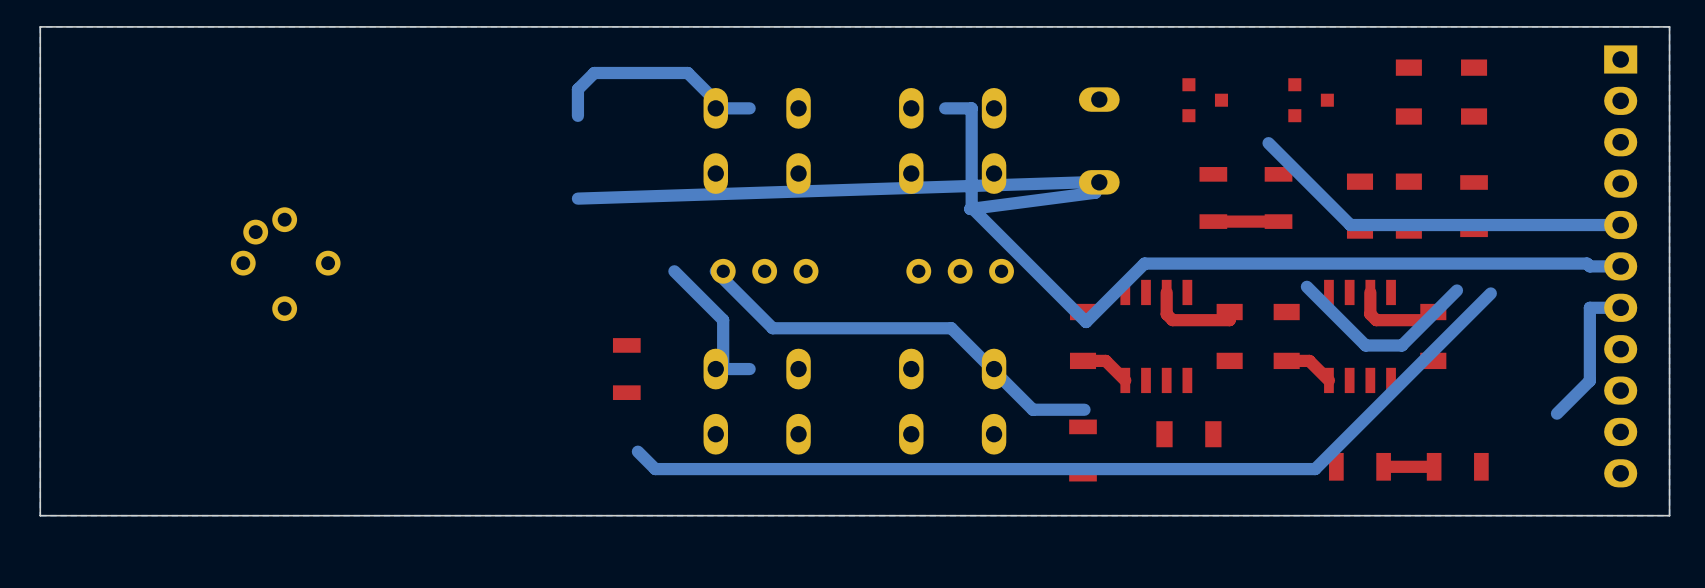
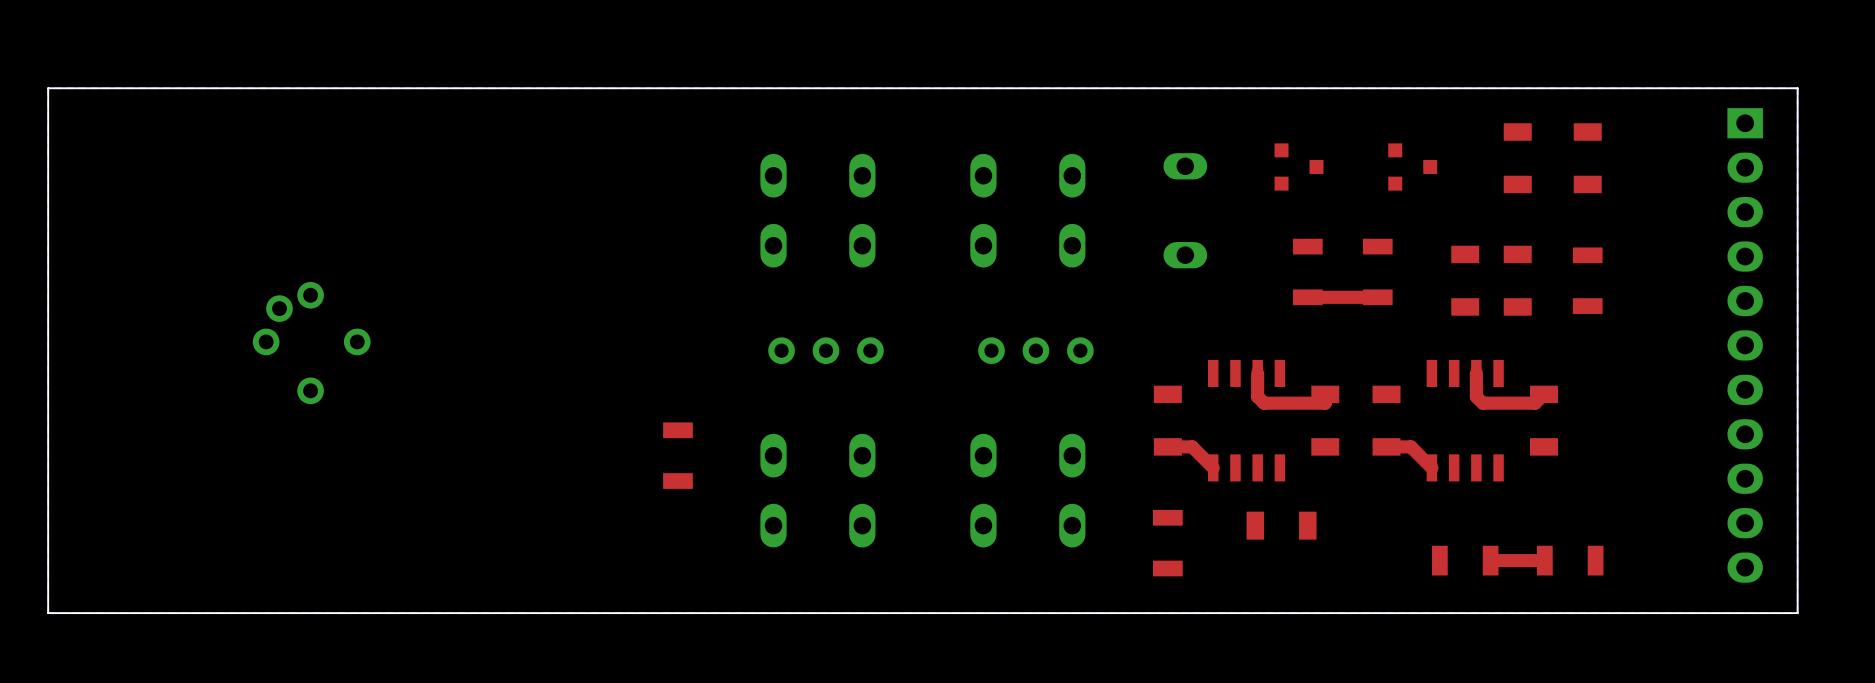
bottom track: (749, 108) (723, 108) (687, 72) (594, 72) (577, 89) (577, 115) -> none
bottom track: (945, 108) (971, 108) (971, 207) -> none
bottom track: (1268, 143) (1350, 225) (1620, 225) -> none
bottom track: (577, 198) (1085, 182) (1095, 192) (970, 209) (971, 207) -> none
bottom track: (971, 207) (1086, 322) (1144, 263) (1587, 263) (1589, 266) (1620, 266) -> none
bottom track: (674, 271) (723, 320) (723, 369) (749, 369) -> none
bottom track: (715, 271) (772, 328) (951, 328) (1032, 409) (1084, 409) -> none
bottom track: (1306, 286) (1365, 345) (1401, 345) (1456, 290) -> none
bottom track: (1490, 293) (1315, 469) (655, 469) (637, 451) -> none
bottom track: (1620, 307) (1589, 307) (1589, 380) (1556, 413) -> none

